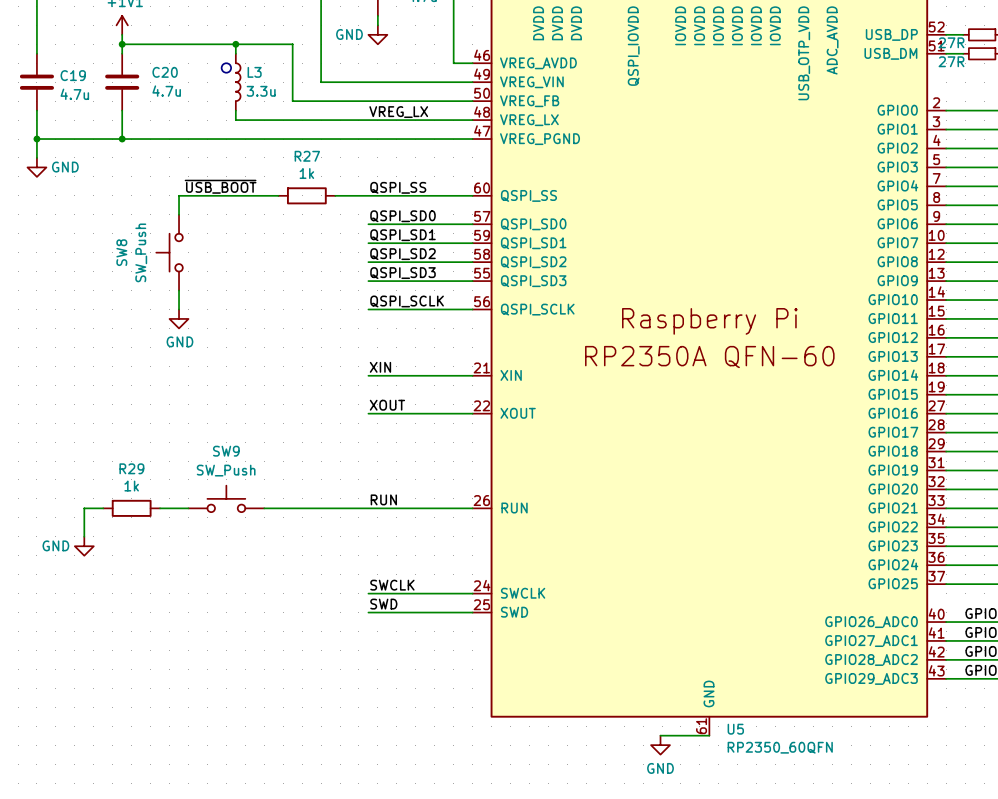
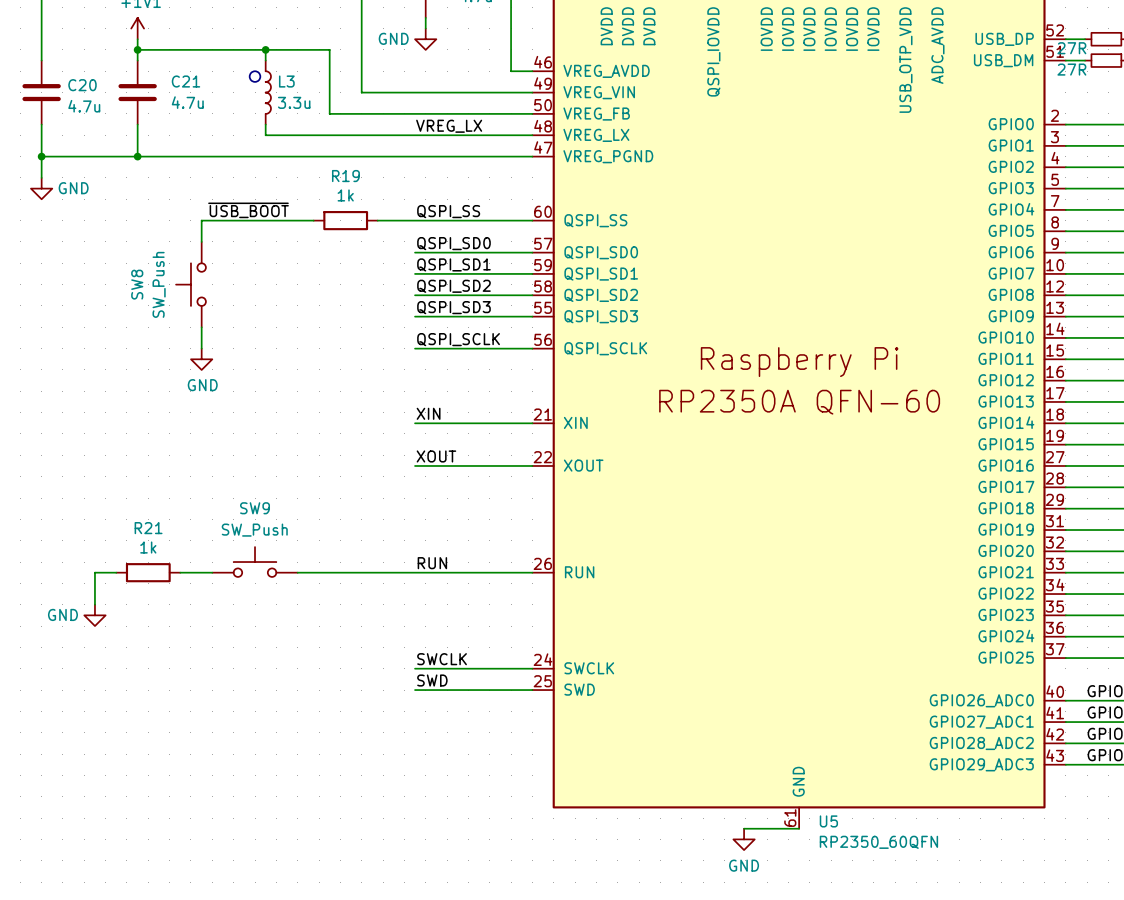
C20 name: C20 (165, 72) -> C21 (185, 81)
C19 name: C19 (73, 75) -> C20 (82, 85)
R27 name: R27 (307, 156) -> R19 (345, 176)
R29 name: R29 (131, 468) -> R21 (148, 528)

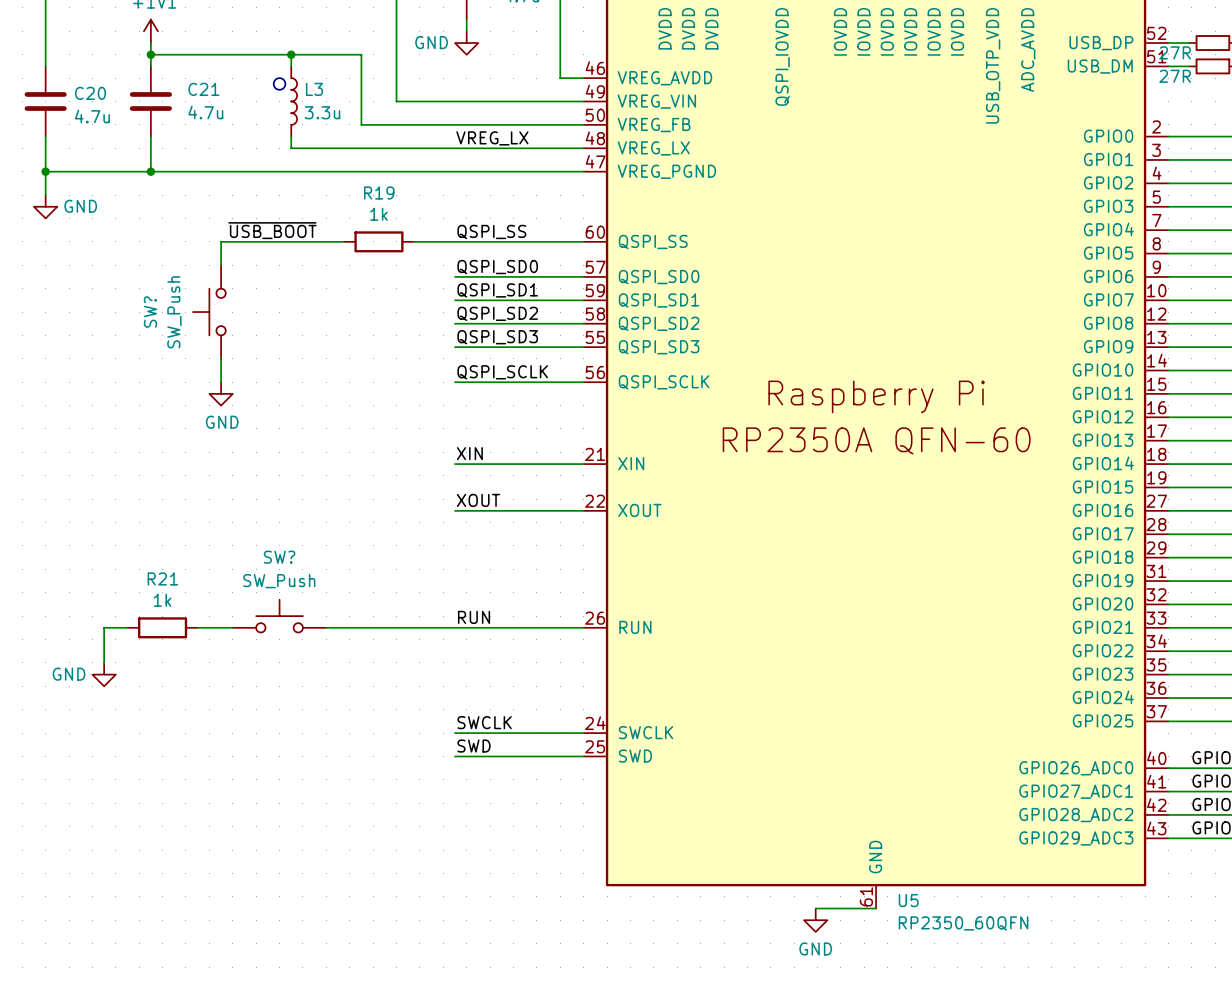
SW8 name: SW8 (137, 284) -> SW? (150, 312)
SW9 name: SW9 (255, 508) -> SW? (279, 557)

